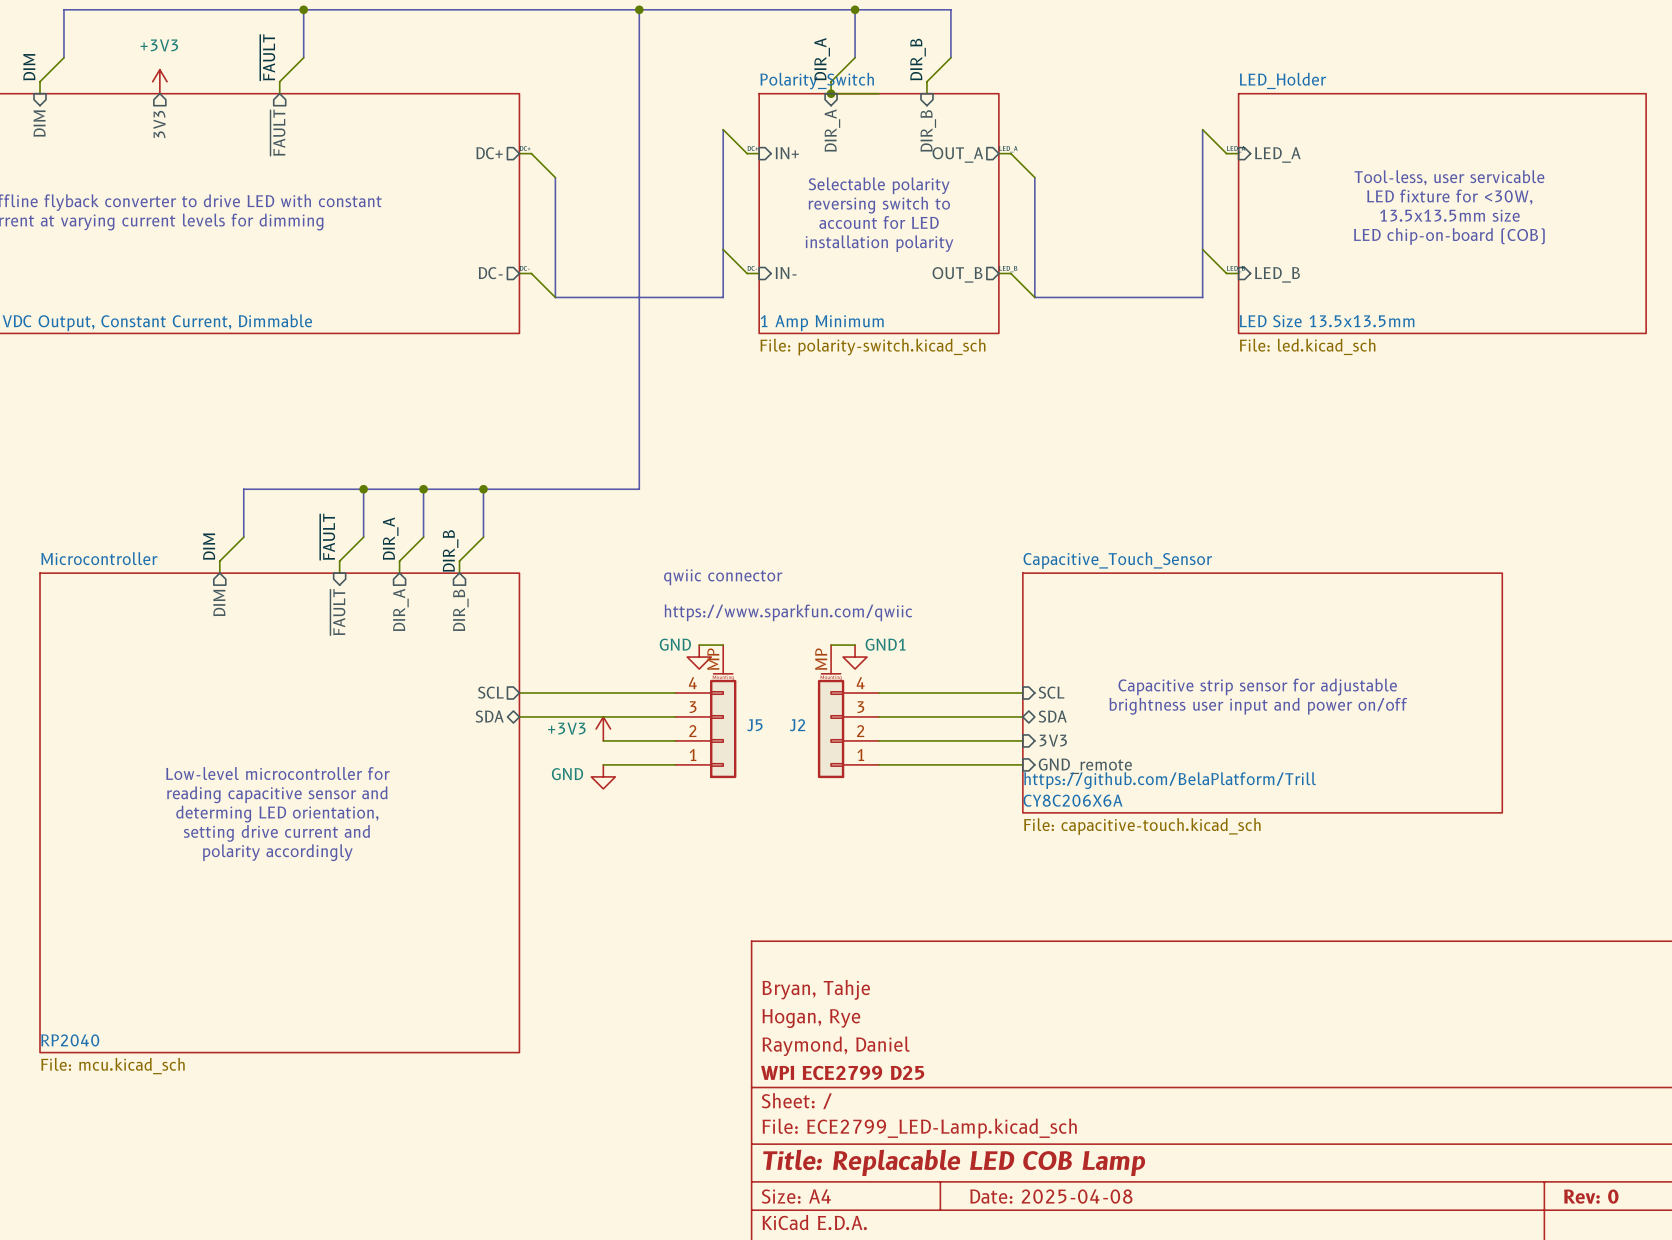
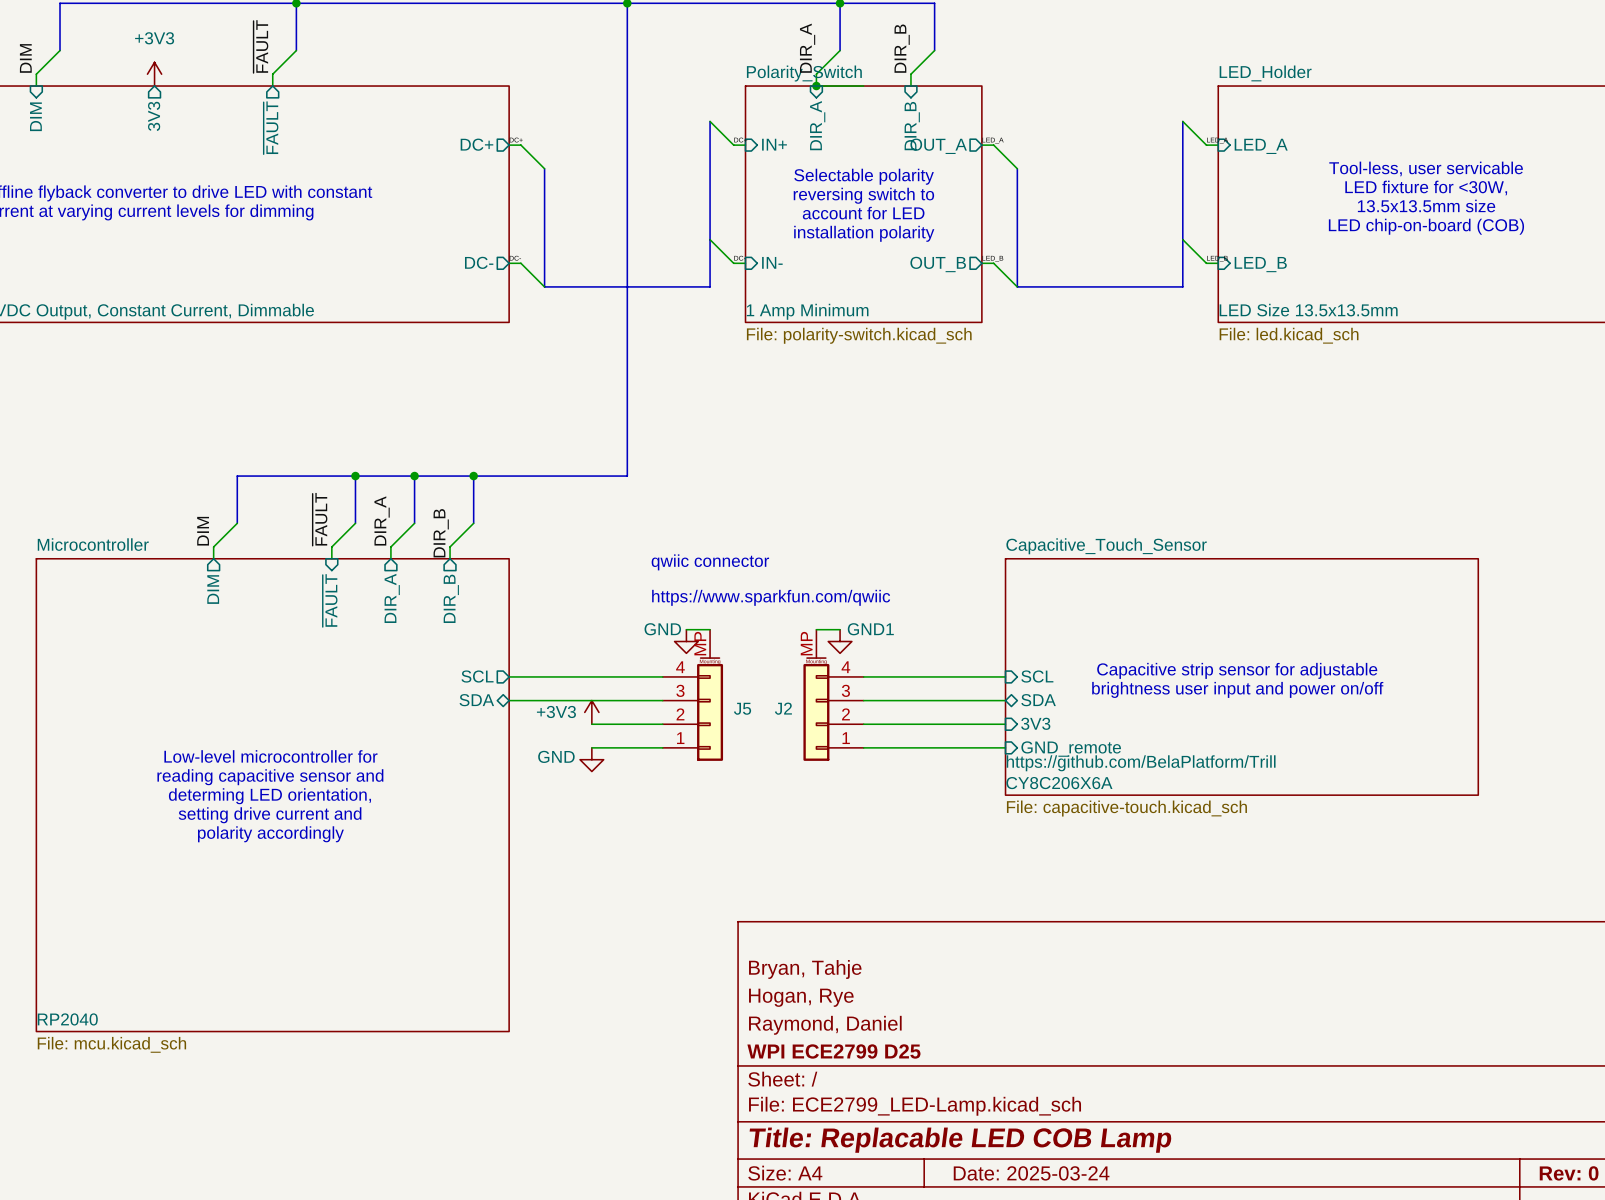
title block: Date: 2025-04-08 (1051, 1196) -> Date: 2025-03-24 (1031, 1173)

